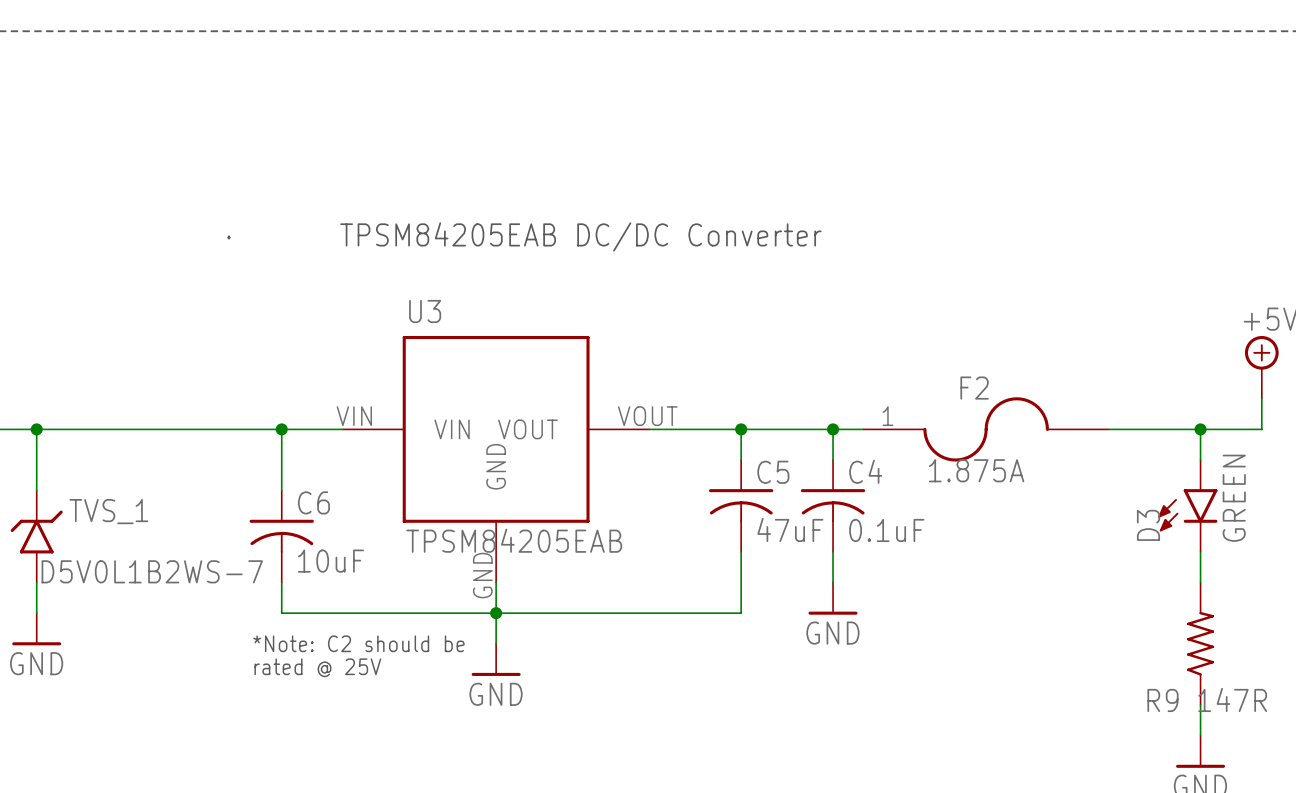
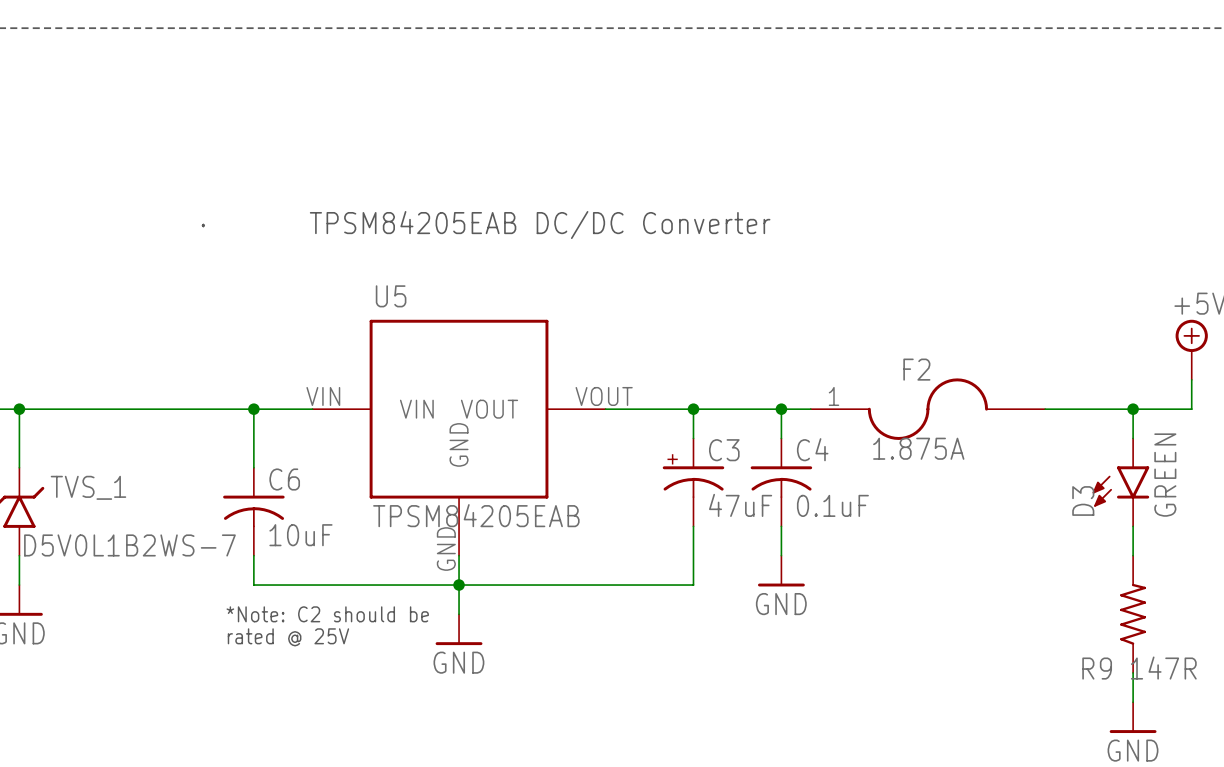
U3 name: U3 (425, 311) -> U5 (391, 296)
C5: 47uF (741, 505) -> none
C3: none -> 47uF (693, 482)

